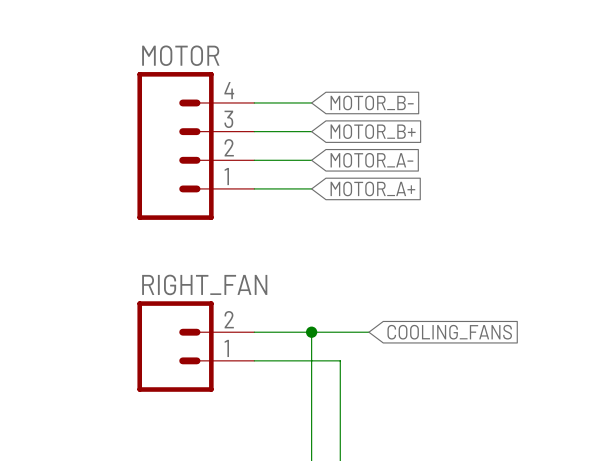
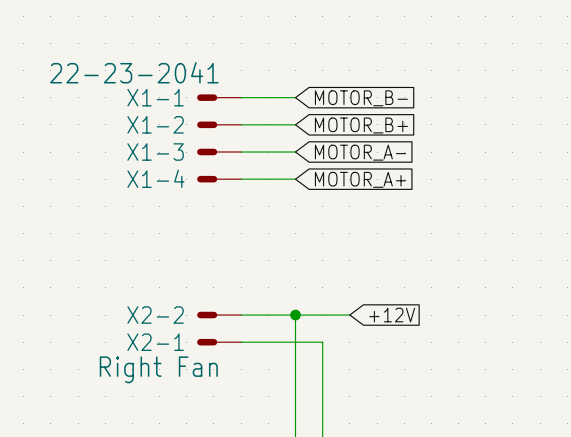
X1-1: none -> 22-23-2041 (219, 97)
X1-2: none -> (219, 124)
MOTOR: (195, 145) -> none
X1-3: none -> (219, 152)
X1-4: none -> (219, 179)
X2-2: none -> (219, 315)
global label: COOLING_FANS (449, 332) -> +12V (392, 315)
RIGHT_FAN: (195, 346) -> none
X2-1: none -> Right Fan (219, 342)

